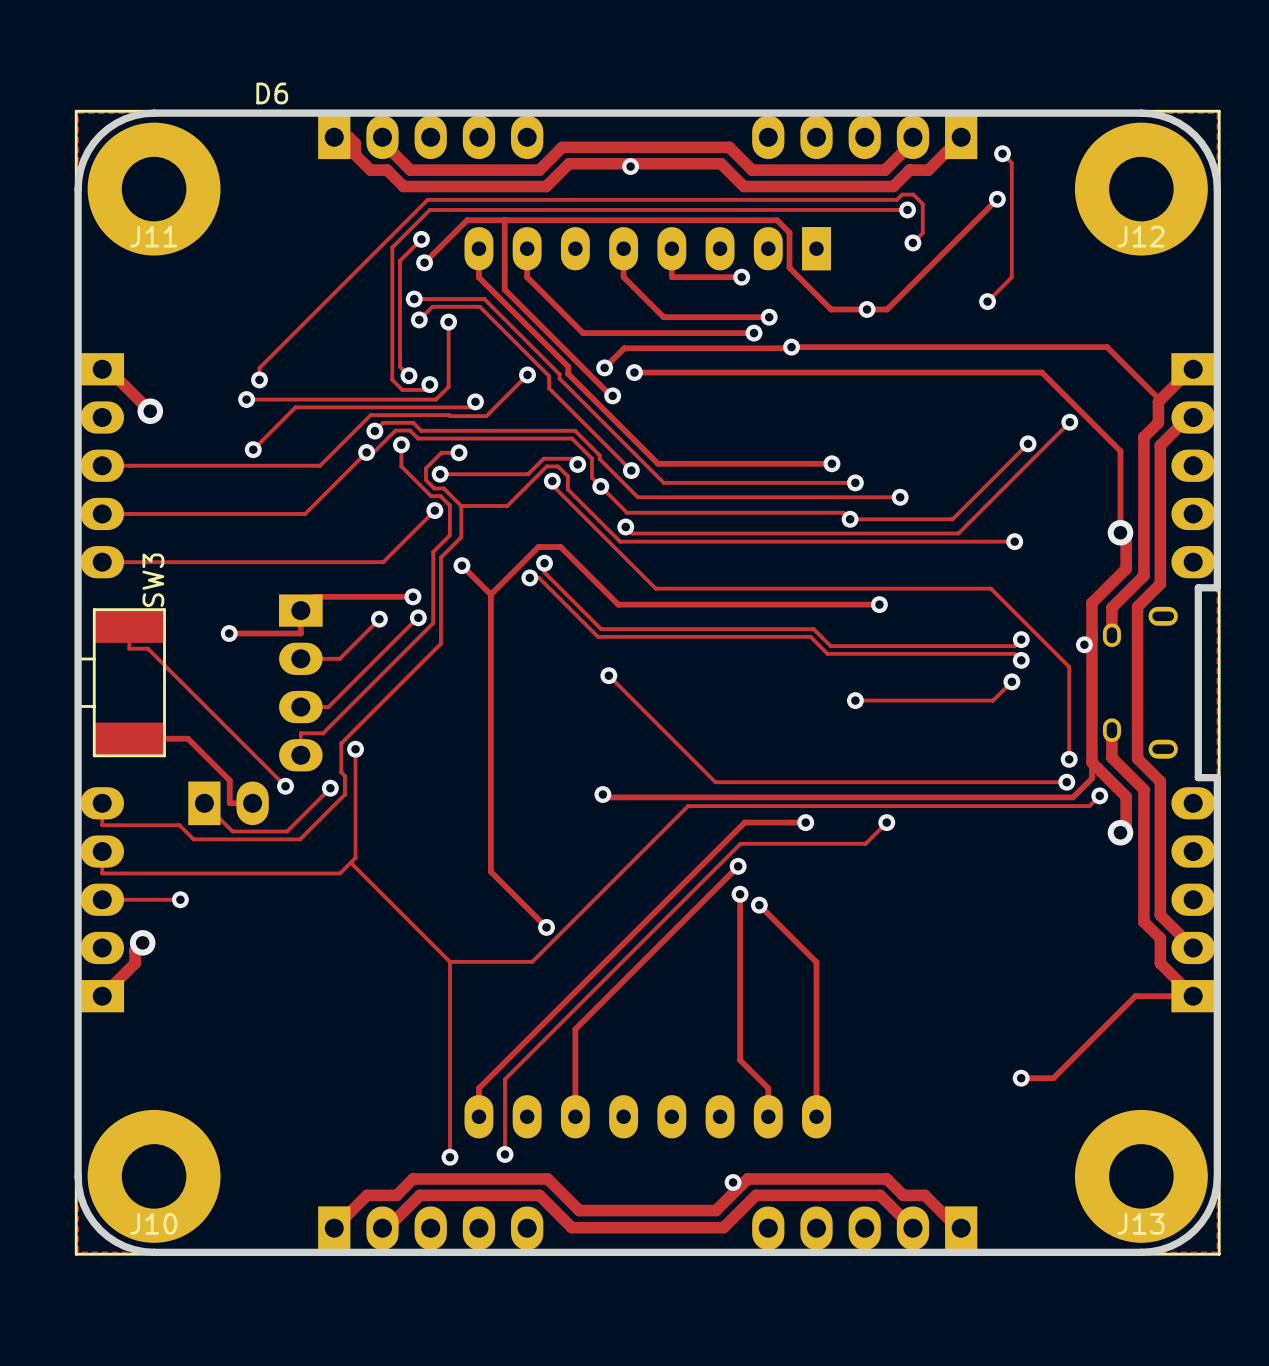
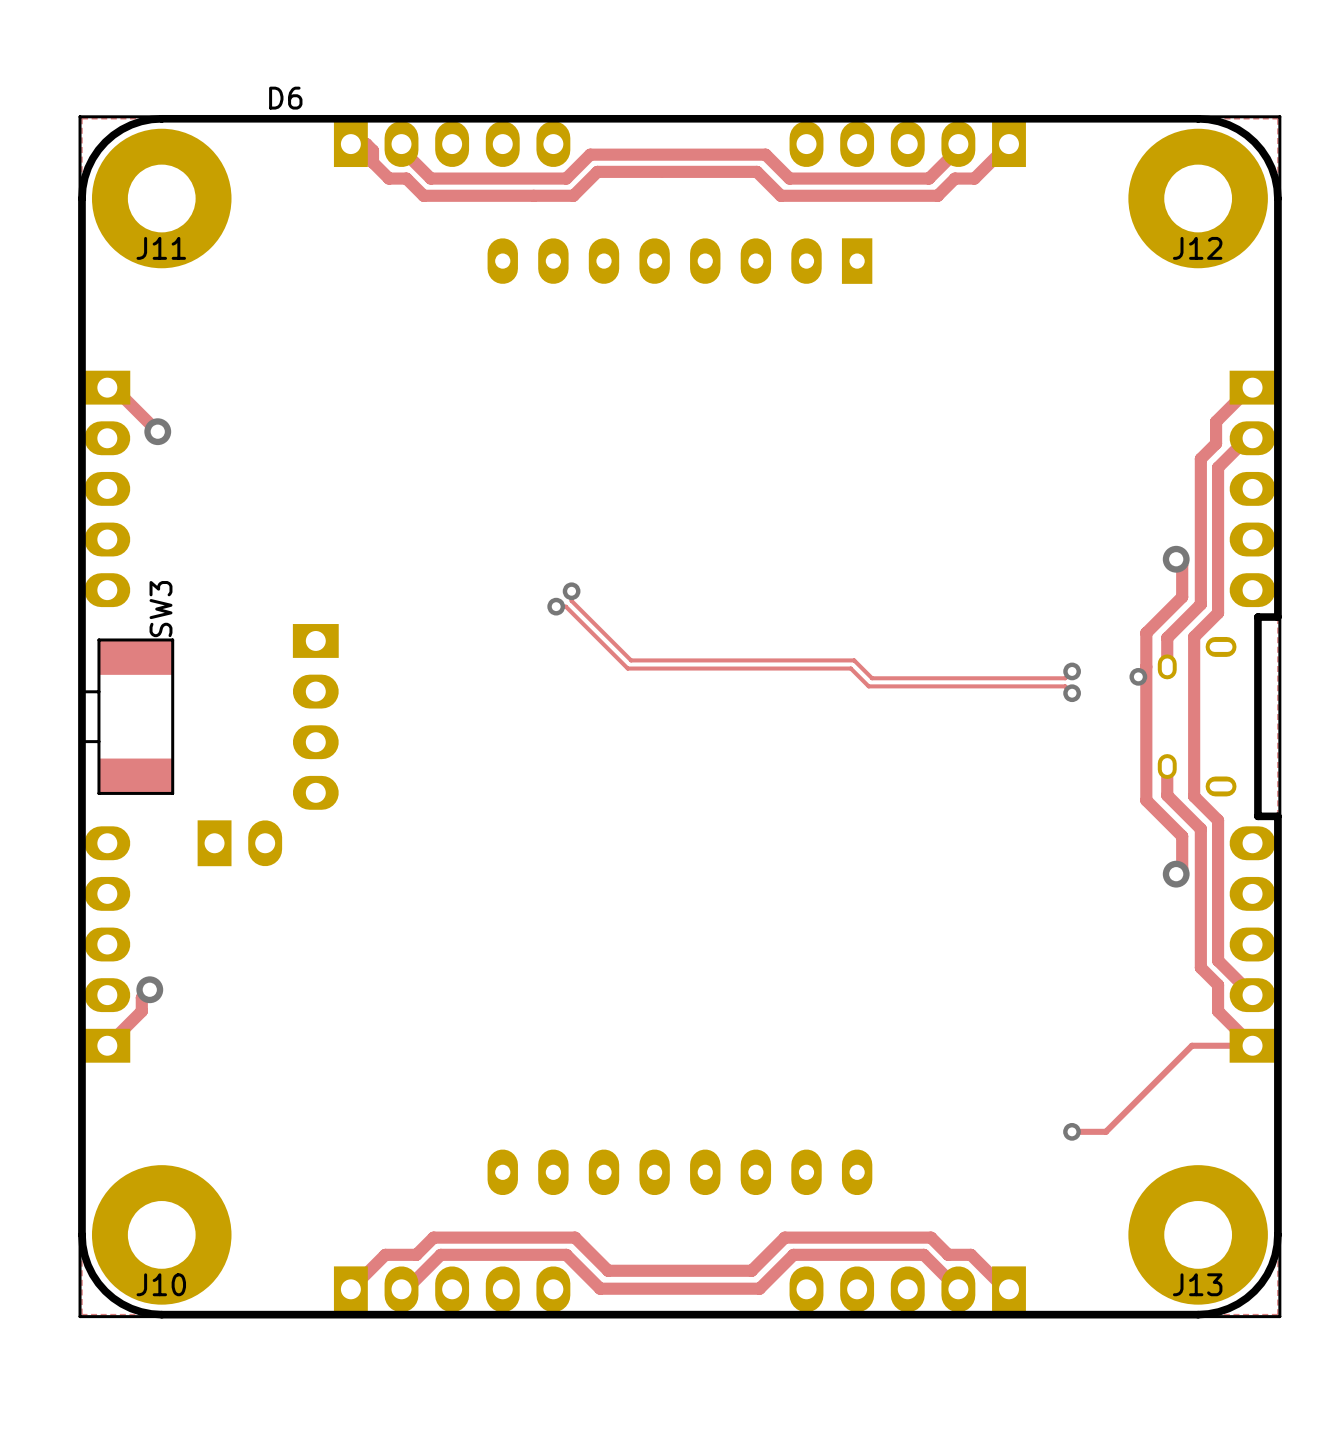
track: (1002, 153) (1011, 162) (1011, 277) (987, 301) -> none
via: (1002, 153) -> none
via: (630, 166) -> none
track: (997, 199) (887, 309) (831, 309) (789, 267) (789, 232) (777, 220) (467, 220) (424, 262) -> none
via: (997, 199) -> none
track: (907, 209) (429, 209) (392, 247) (392, 379) (402, 389) (424, 389) (429, 384) -> none
via: (907, 209) -> none
track: (504, 220) (504, 289) (612, 395) -> none
track: (421, 239) (400, 260) (400, 366) (408, 375) -> none
via: (421, 239) -> none
track: (912, 242) (922, 233) (922, 204) (913, 194) (902, 194) (896, 199) (427, 199) (259, 368) (259, 379) -> none
via: (912, 242) -> none
track: (478, 248) (478, 277) (568, 366) (568, 374) (658, 463) (831, 463) -> none
track: (527, 248) (527, 277) (583, 333) (754, 333) -> none
track: (623, 248) (623, 277) (663, 317) (769, 317) -> none
track: (671, 248) (671, 277) (741, 277) -> none
via: (424, 262) -> none
via: (741, 277) -> none
track: (414, 299) (484, 299) (559, 374) (559, 378) (663, 482) (855, 482) -> none
via: (414, 299) -> none
via: (987, 301) -> none
via: (867, 309) -> none
via: (769, 317) -> none
track: (419, 319) (432, 306) (479, 306) (549, 376) (549, 388) (631, 470) -> none
via: (419, 319) -> none
track: (448, 322) (448, 386) (436, 399) (246, 399) -> none
via: (448, 322) -> none
via: (754, 333) -> none
via: (791, 347) -> none
track: (604, 367) (624, 348) (1107, 347) (1160, 400) -> none
via: (604, 367) -> none
track: (634, 372) (1041, 372) (1120, 451) (1120, 532) -> none
via: (634, 372) -> none
track: (527, 374) (486, 416) (370, 415) (320, 465) (102, 465) -> none
via: (527, 374) -> none
via: (408, 375) -> none
via: (259, 379) -> none
via: (429, 384) -> none
via: (612, 395) -> none
via: (246, 399) -> none
track: (475, 401) (469, 407) (295, 407) (253, 449) -> none
via: (475, 401) -> none
track: (1069, 422) (958, 533) (632, 533) (625, 526) -> none
via: (1069, 422) -> none
track: (374, 431) (383, 422) (413, 422) (421, 430) (575, 430) (599, 455) (599, 459) (637, 497) (900, 497) -> none
via: (374, 431) -> none
track: (1028, 443) (952, 519) (850, 519) (843, 512) (627, 512) (591, 477) (591, 458) (571, 438) (418, 438) (410, 430) (395, 430) (373, 452) (366, 452) (305, 513) (102, 513) -> none
via: (1028, 443) -> none
track: (401, 444) (401, 466) (431, 496) (440, 496) (449, 505) (449, 535) (433, 552) (433, 623) (323, 733) (300, 733) (300, 755) -> none
via: (401, 444) -> none
via: (253, 449) -> none
via: (366, 452) -> none
track: (459, 452) (441, 452) (425, 468) (425, 480) (434, 488) (443, 488) (461, 505) -> none
via: (459, 452) -> none
via: (831, 463) -> none
track: (577, 464) (571, 458) (543, 458) (528, 474) (440, 474) -> none
via: (577, 464) -> none
via: (631, 470) -> none
via: (440, 474) -> none
track: (552, 481) (552, 485) (655, 588) (990, 588) (1069, 666) (1069, 759) -> none
via: (552, 481) -> none
via: (855, 482) -> none
via: (600, 486) -> none
via: (900, 497) -> none
track: (461, 505) (507, 505) (546, 466) (557, 466) (567, 476) (567, 489) (620, 541) (1014, 541) -> none
track: (461, 505) (461, 537) (440, 557) (440, 643) (341, 743) (341, 772) (344, 776) (344, 794) (300, 839) (193, 839) (179, 825) (102, 825) (102, 803) -> none
track: (434, 510) (383, 562) (102, 562) -> none
via: (434, 510) -> none
via: (850, 519) -> none
via: (625, 526) -> none
via: (1014, 541) -> none
track: (461, 565) (490, 594) -> none
via: (461, 565) -> none
track: (490, 594) (538, 547) (560, 547) (618, 604) (879, 604) -> none
track: (490, 594) (490, 871) (546, 927) -> none
track: (412, 596) (314, 596) (300, 610) (300, 633) (229, 633) -> none
via: (412, 596) -> none
via: (879, 604) -> none
track: (418, 617) (328, 707) (300, 707) -> none
via: (418, 617) -> none
track: (379, 619) (339, 658) (300, 658) -> none
via: (379, 619) -> none
track: (129, 626) (129, 648) (147, 648) (285, 786) -> none
via: (229, 633) -> none
track: (608, 675) (715, 782) (1066, 782) -> none
via: (608, 675) -> none
track: (1011, 681) (993, 700) (855, 700) -> none
via: (1011, 681) -> none
via: (855, 700) -> none
track: (129, 738) (188, 738) (229, 780) (229, 803) (252, 803) -> none
track: (355, 749) (355, 857) (340, 873) (102, 873) (102, 851) -> none
via: (355, 749) -> none
via: (1069, 759) -> none
track: (1091, 762) (1091, 778) (1073, 797) (605, 797) (602, 794) -> none
via: (1066, 782) -> none
via: (285, 786) -> none
track: (330, 788) (287, 831) (232, 831) (204, 803) -> none
via: (330, 788) -> none
via: (602, 794) -> none
track: (1099, 795) (1089, 806) (688, 806) (532, 961) (449, 961) -> none
via: (1099, 795) -> none
track: (805, 822) (744, 822) (478, 1088) (478, 1116) -> none
via: (805, 822) -> none
track: (886, 822) (865, 843) (740, 843) (505, 1079) (505, 1154) -> none
via: (886, 822) -> none
track: (350, 862) (449, 961) -> none
track: (738, 866) (575, 1029) (575, 1116) -> none
via: (738, 866) -> none
track: (740, 894) (740, 1060) (768, 1088) (768, 1116) -> none
via: (740, 894) -> none
track: (102, 899) (180, 899) -> none
via: (180, 899) -> none
track: (759, 905) (816, 962) (816, 1116) -> none
via: (759, 905) -> none
via: (546, 927) -> none
track: (449, 961) (449, 1157) -> none
via: (505, 1154) -> none
via: (449, 1157) -> none
via: (733, 1182) -> none

